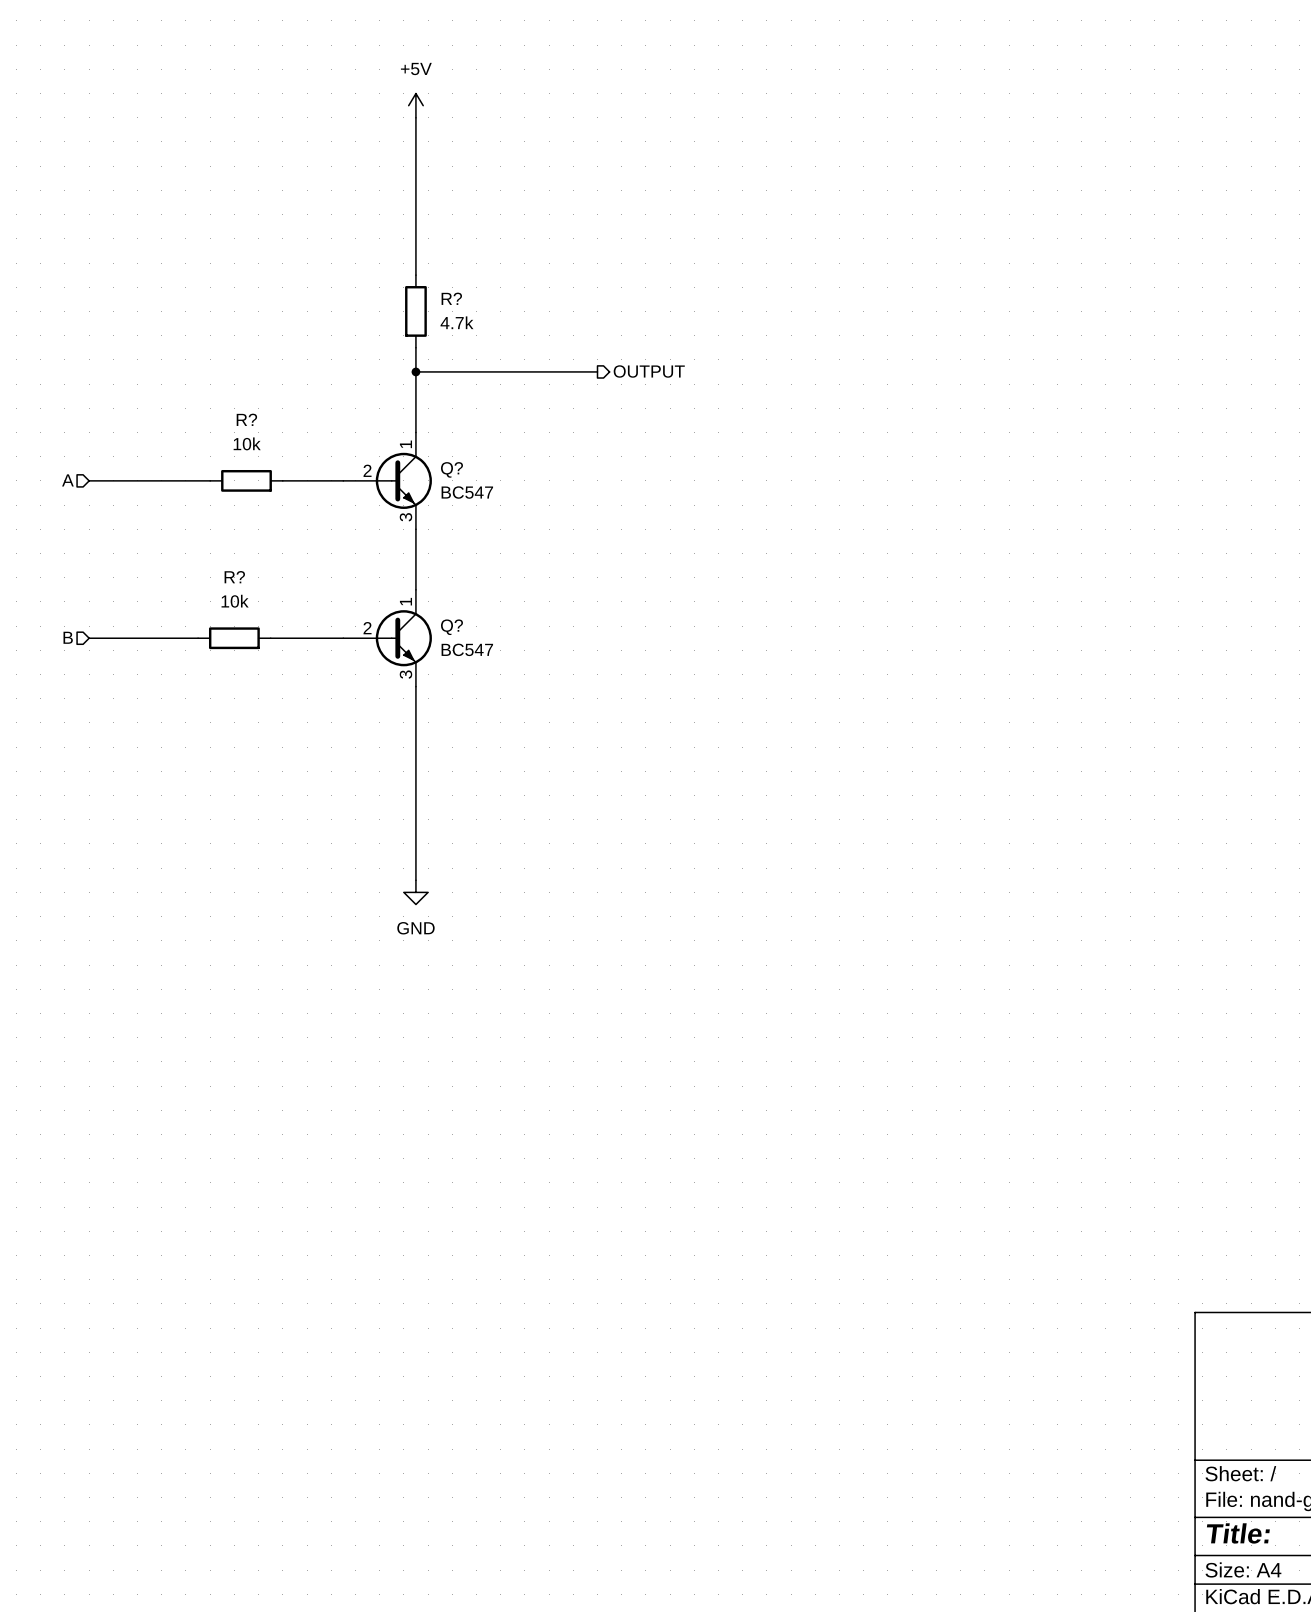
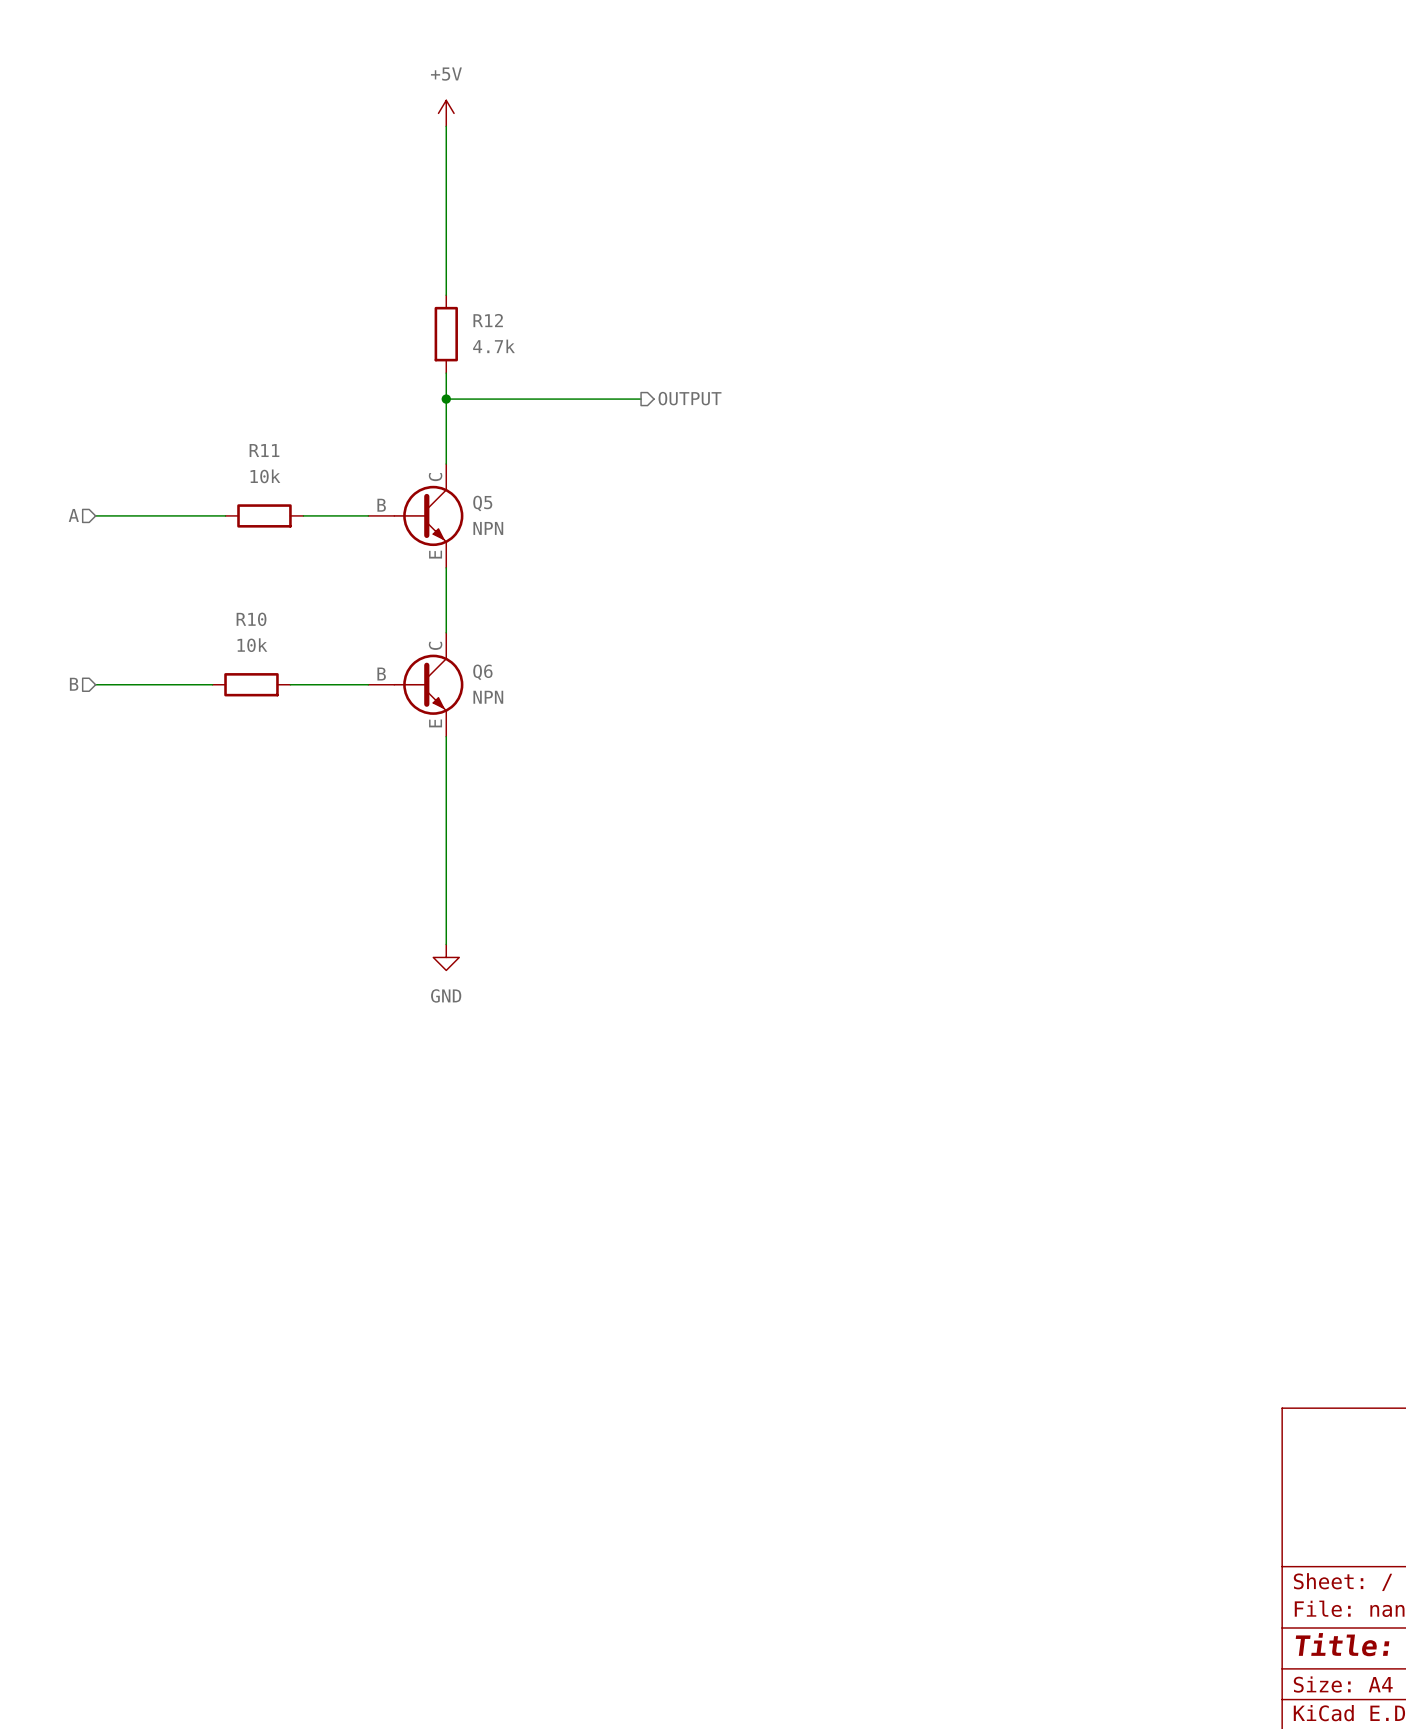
R? name: R? (451, 298) -> R12 (488, 320)
R? name: R? (246, 419) -> R11 (264, 450)
Q?: BC547 (387, 480) -> none
Q5: none -> NPN (415, 515)
R? name: R? (234, 577) -> R10 (251, 619)
Q?: BC547 (387, 638) -> none
Q6: none -> NPN (415, 684)

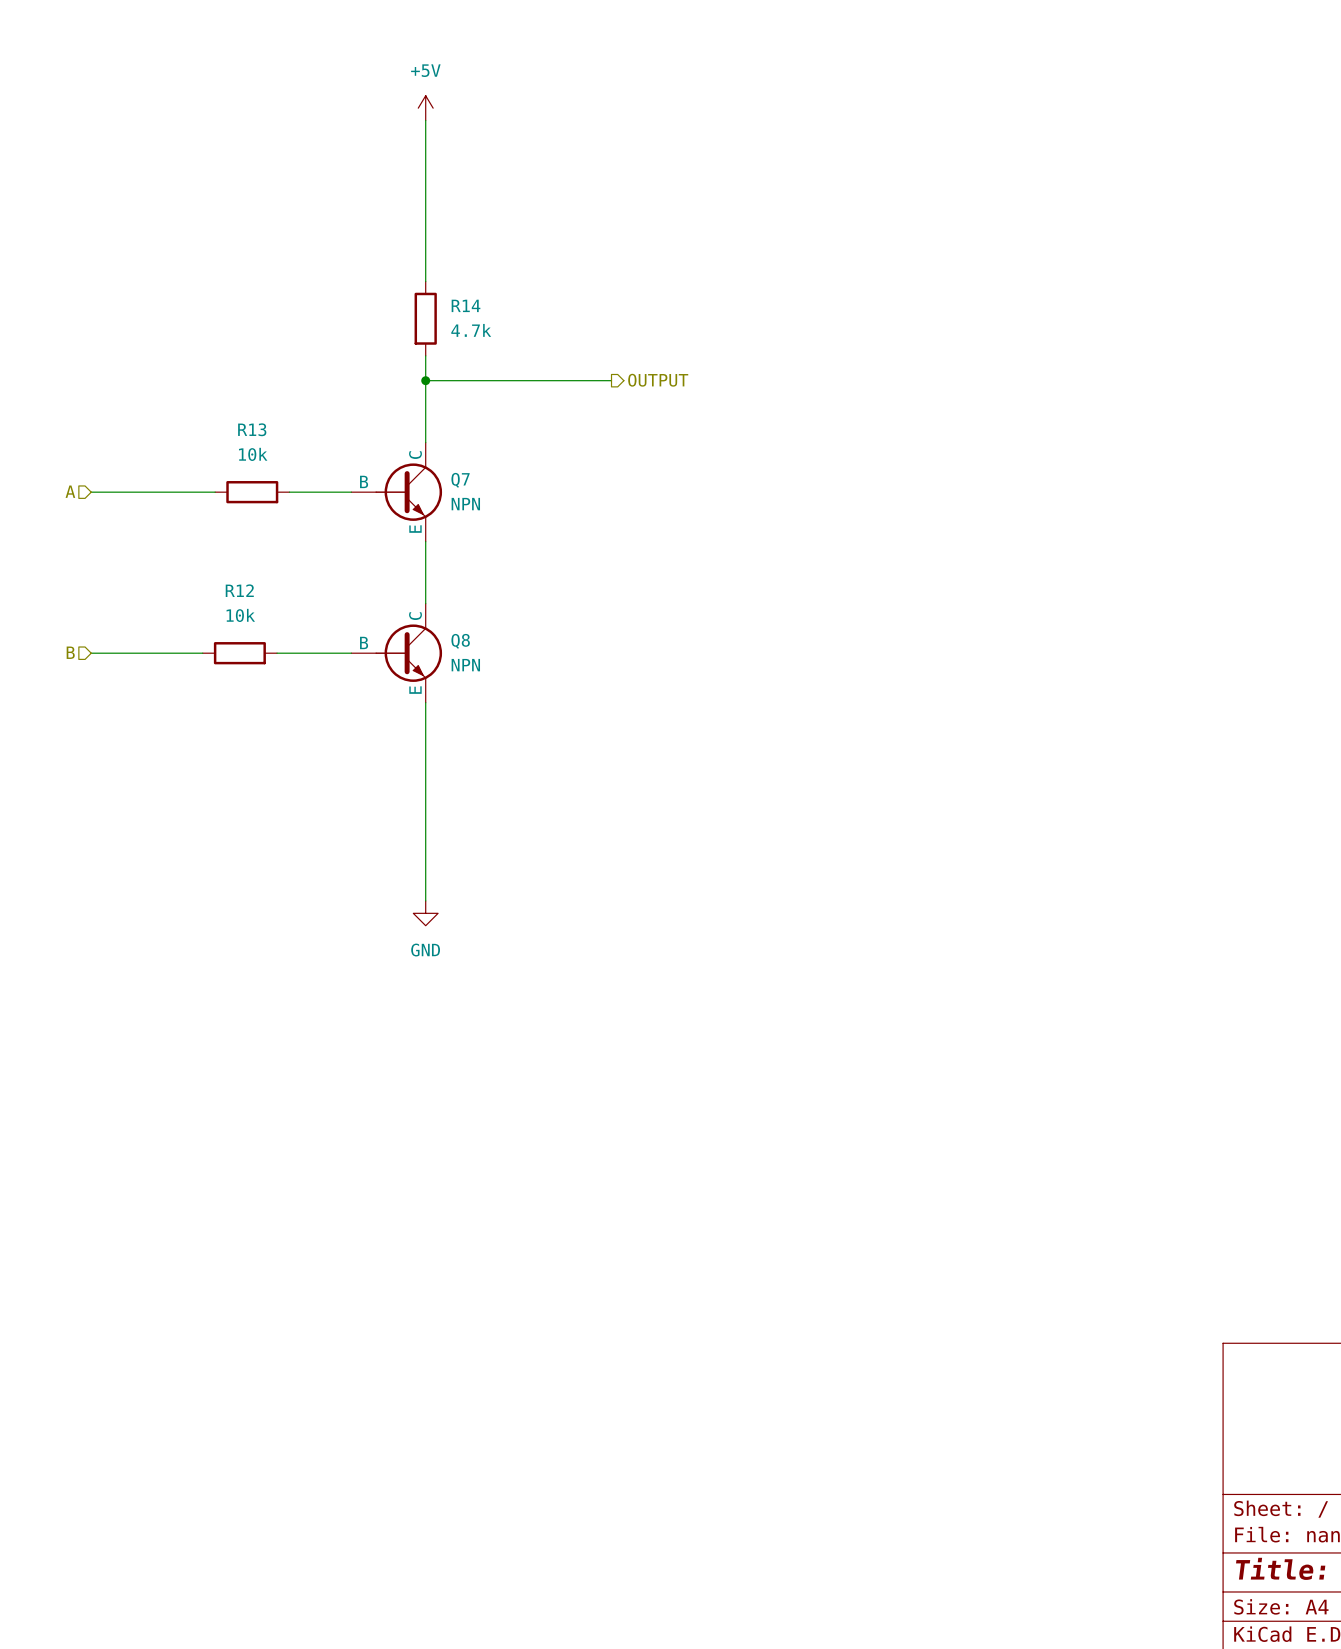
R12 name: R12 (488, 320) -> R14 (466, 305)
R11 name: R11 (264, 450) -> R13 (252, 429)
Q5 name: Q5 (482, 503) -> Q7 (460, 480)
R10 name: R10 (251, 619) -> R12 (239, 590)
Q6 name: Q6 (482, 672) -> Q8 (460, 641)

